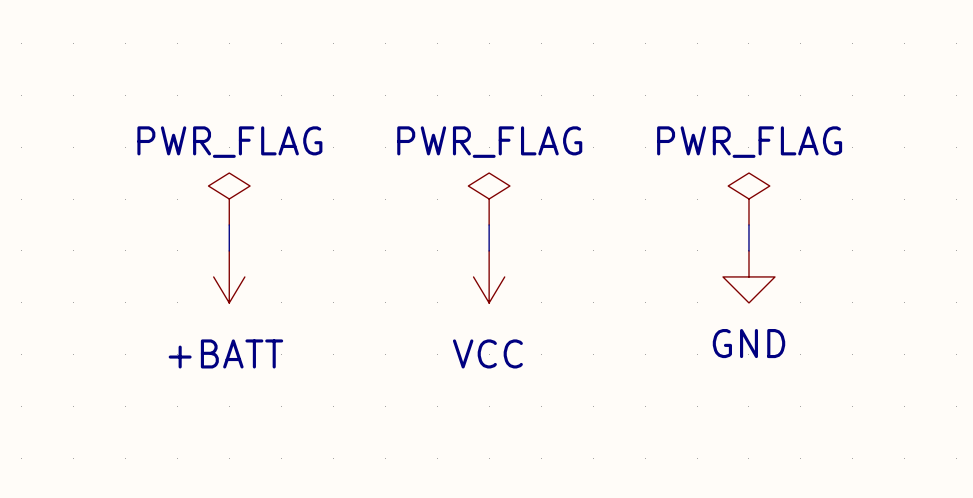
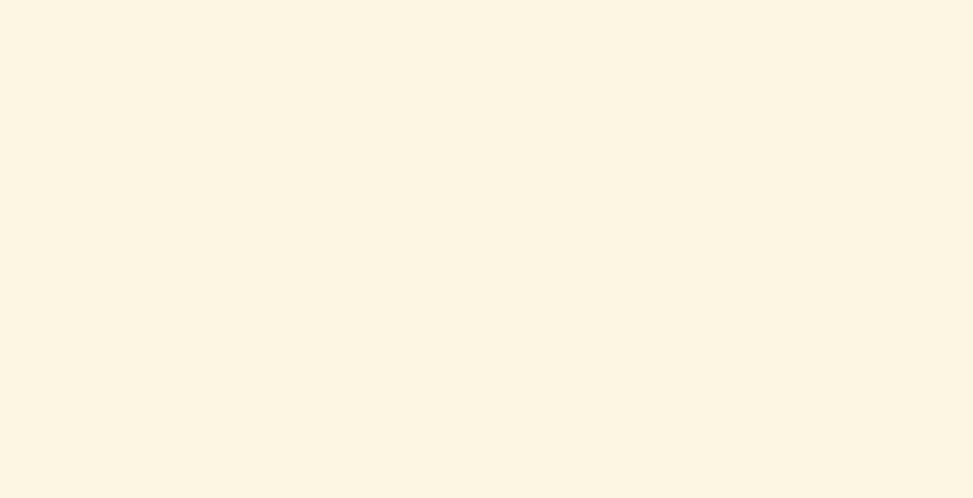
power symbol: PWR_FLAG (229, 199) -> none
power symbol: PWR_FLAG (489, 199) -> none
power symbol: PWR_FLAG (748, 199) -> none
wire: (229, 224) (229, 250) -> none
wire: (489, 224) (489, 250) -> none
wire: (748, 224) (748, 250) -> none
power symbol: +BATT (229, 276) -> none
power symbol: VCC (489, 276) -> none
power symbol: GND (748, 276) -> none

